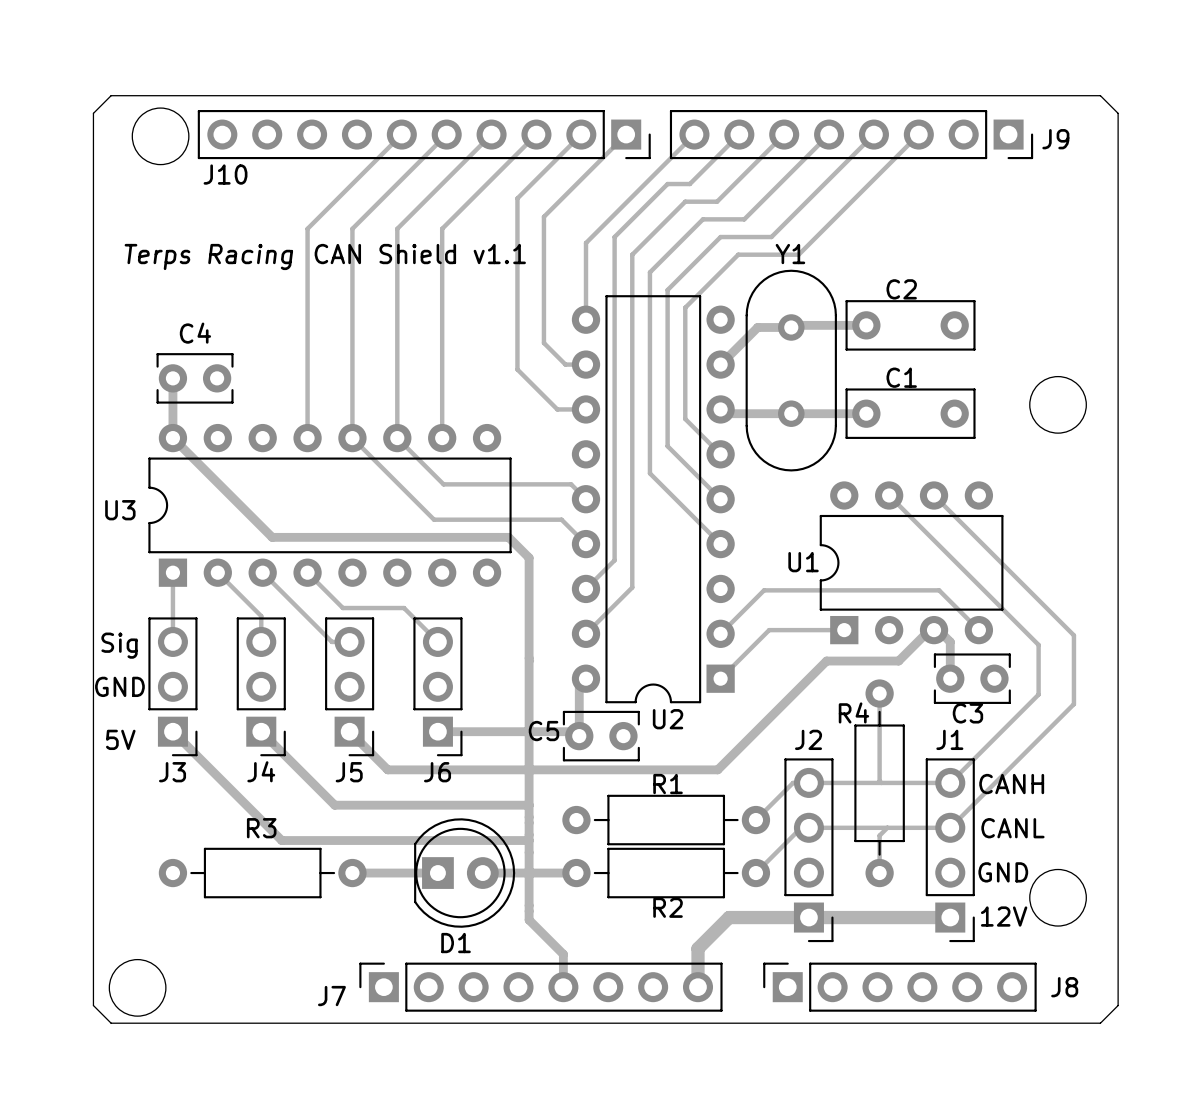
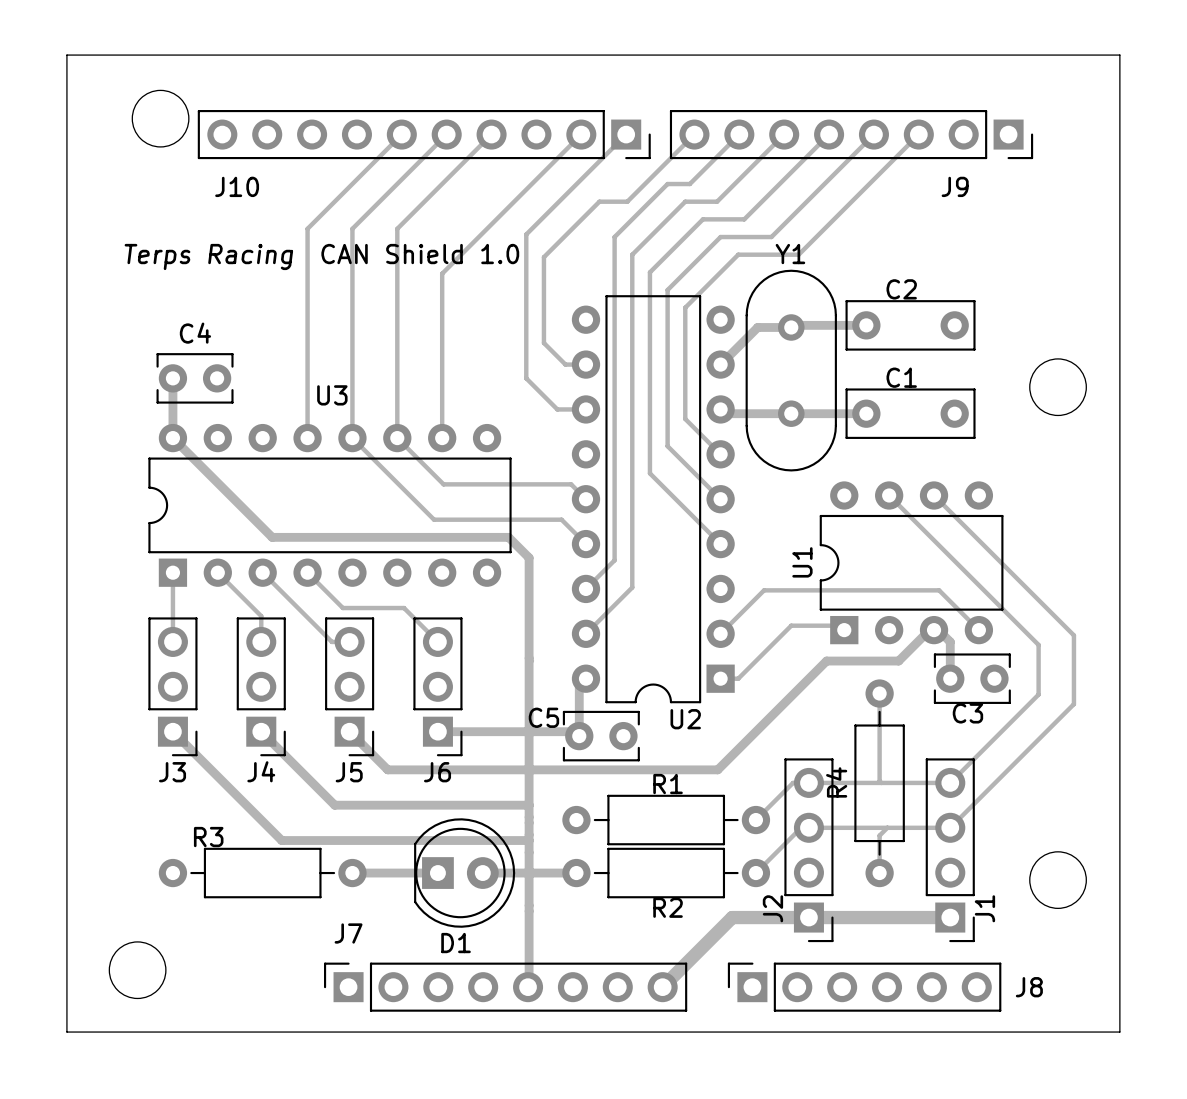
board edge: (111, 95) (93, 113) (93, 1005) (111, 1023) (1100, 1023) (1118, 1005) (1118, 113) (1100, 95) (111, 95) -> (66, 55) (66, 1032) (1119, 1032) (1119, 55) (66, 55)
track: (536, 134) (442, 228) (442, 273) -> (517, 198) (442, 273)
round board edge position: (160, 136) -> (160, 118)
J9 name position: J9 (1055, 139) -> J9 (955, 186)
J10 name position: J10 (225, 174) -> J10 (237, 186)
track: (517, 198) (517, 369) (526, 378) -> (543, 216) (526, 234) (526, 378)
track: (627, 201) (585, 243) (585, 319) -> (627, 201) (599, 201) (543, 257)
track: (543, 216) (543, 257) -> none
text: CAN Shield v1.1 (420, 254) -> CAN Shield 1.0 (420, 254)
round board edge position: (1058, 404) -> (1058, 387)
U3 name position: U3 (120, 510) -> U3 (332, 395)
U1 name rotation: 0° (803, 562) -> 90° counterclockwise (802, 562)
track: (844, 630) (769, 630) (720, 678) -> (844, 625) (791, 625) (738, 678) (720, 678)
text: Sig (119, 645) -> none
text: GND (119, 686) -> none
R4 name rotation: 0° (853, 712) -> 90° counterclockwise (836, 782)
R4 name position: R4 (853, 712) -> R4 (836, 782)
U2 name position: U2 (668, 719) -> U2 (685, 719)
C5 name position: C5 (543, 731) -> C5 (543, 717)
text: 5V (120, 739) -> none
J2 name rotation: 0° (808, 739) -> 90° counterclockwise (772, 908)
J2 name position: J2 (808, 739) -> J2 (772, 908)
J1 name rotation: 0° (949, 739) -> 90° counterclockwise (984, 908)
J1 name position: J1 (949, 739) -> J1 (984, 908)
text: CANH (1011, 784) -> none
R3 name position: R3 (261, 828) -> R3 (208, 837)
text: CANL (1012, 828) -> none
text: GND (1003, 872) -> none
round board edge position: (1058, 897) -> (1058, 880)
text: 12V (1004, 916) -> none
track: (732, 917) (729, 917) (698, 948) (698, 987) -> (732, 917) (662, 987)
track: (529, 920) (563, 954) (563, 987) -> (529, 920) (528, 987)
round board edge position: (137, 987) -> (137, 970)
J7 position: (540, 987) -> (505, 987)
J8 position: (899, 987) -> (864, 987)
J7 name position: J7 (331, 996) -> J7 (348, 933)

